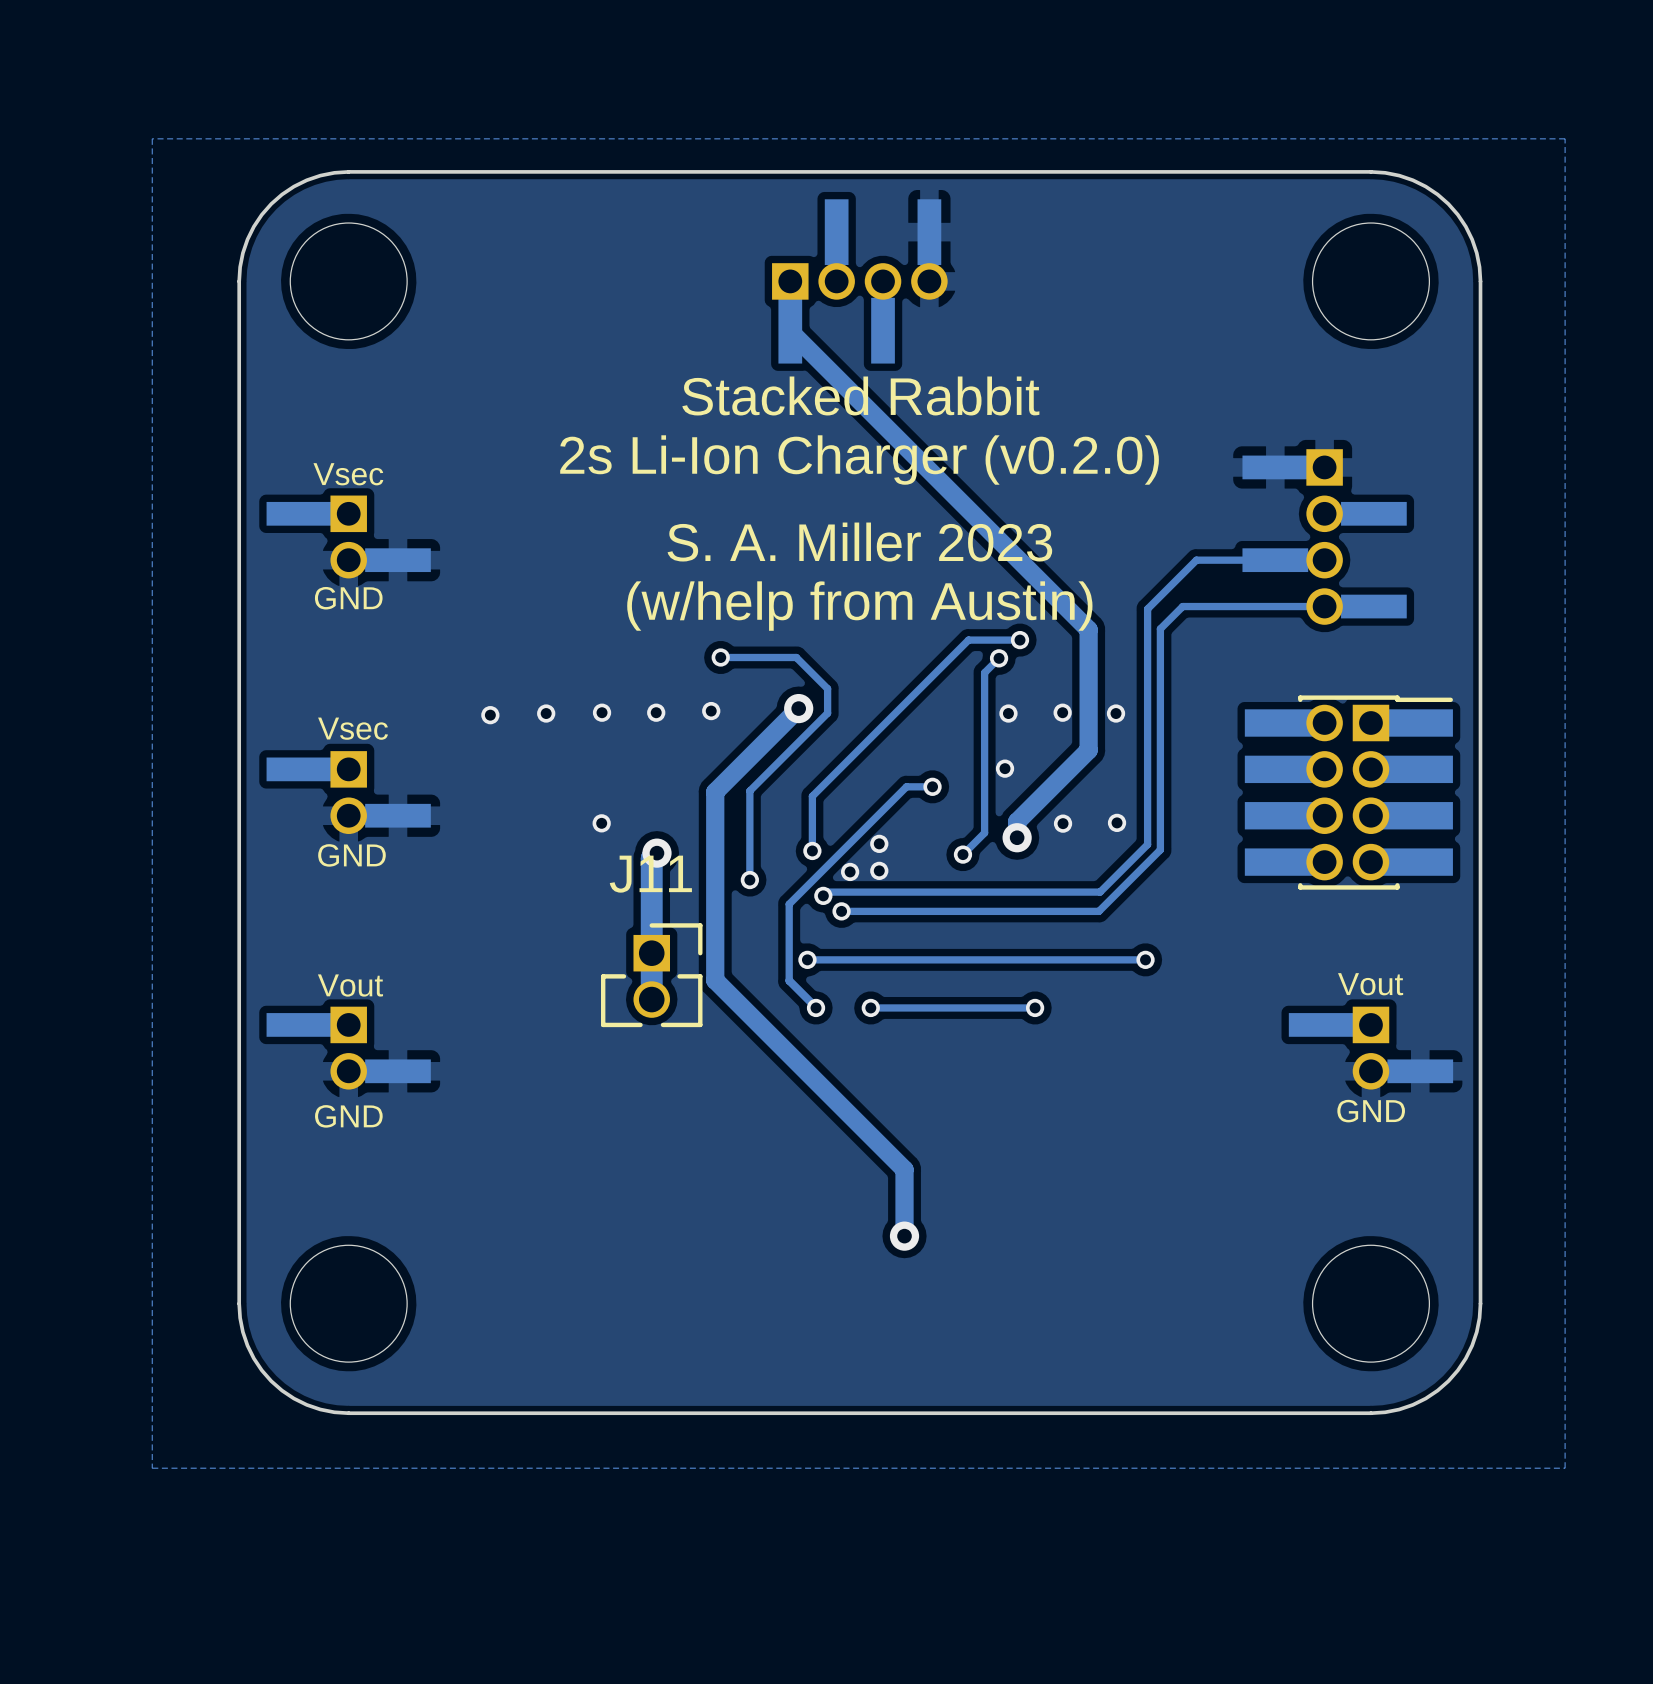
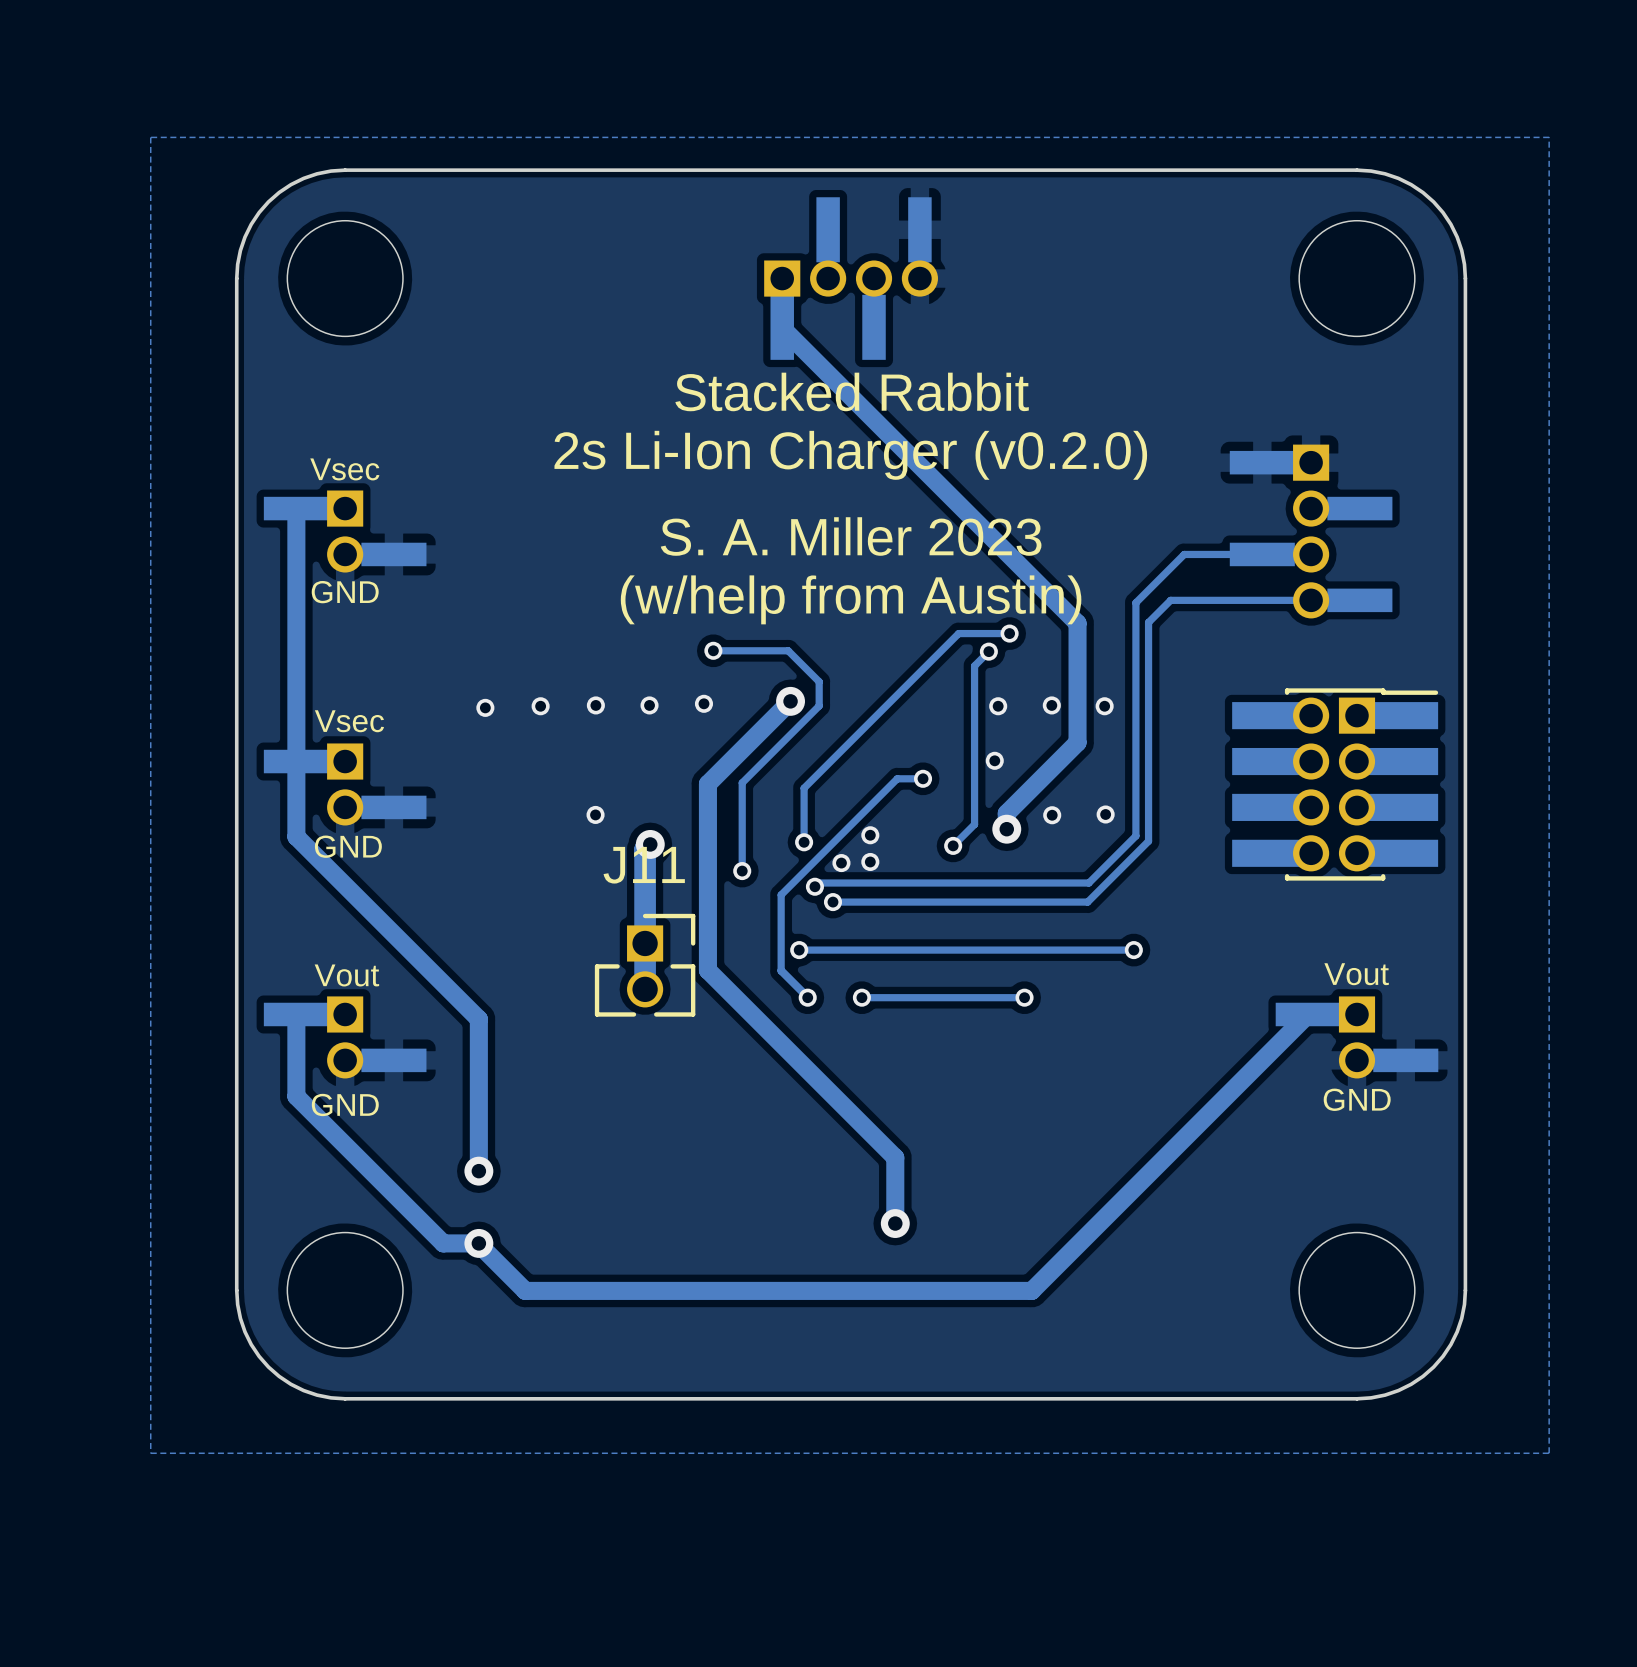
track: none -> (296, 508) (296, 836) (478, 1019) (478, 1171)
track: none -> (1308, 1014) (1031, 1290) (525, 1290) (478, 1243) (443, 1243) (296, 1096) (296, 1014)
via: none -> (478, 1171)
via: none -> (478, 1243)

